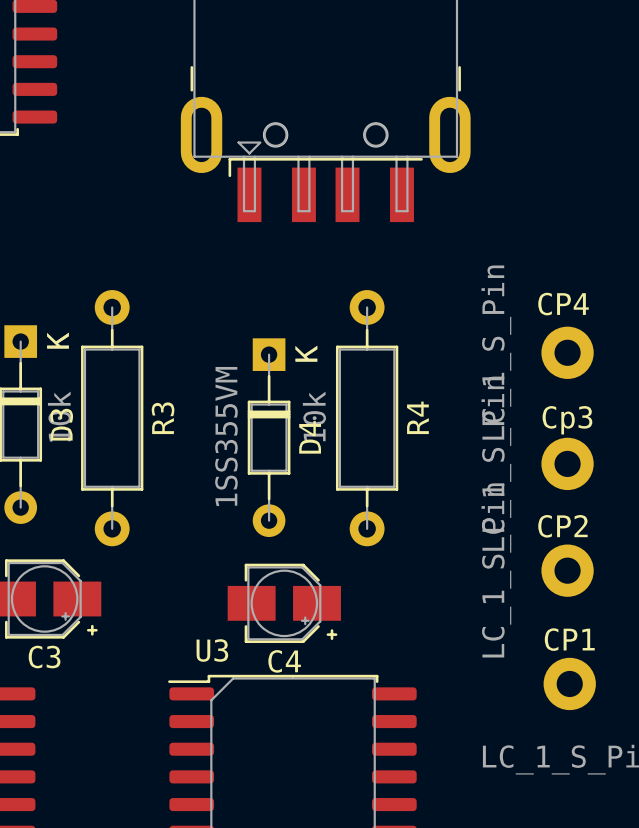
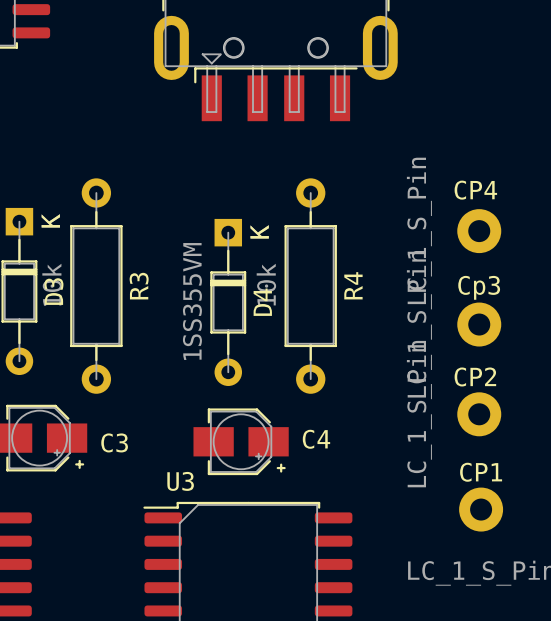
C3 name position: C3 (44, 657) -> C3 (114, 442)
C4 name position: C4 (284, 661) -> C4 (316, 439)

